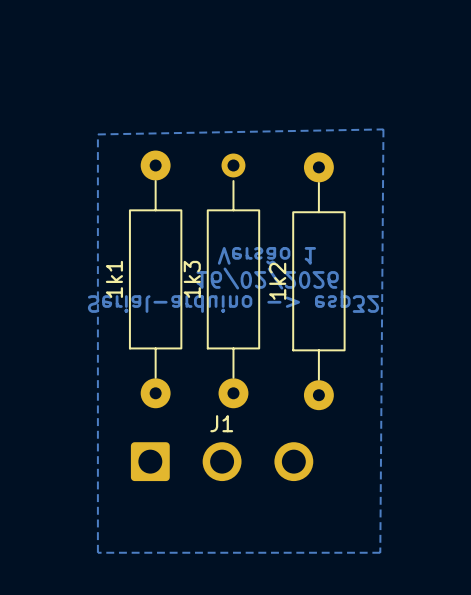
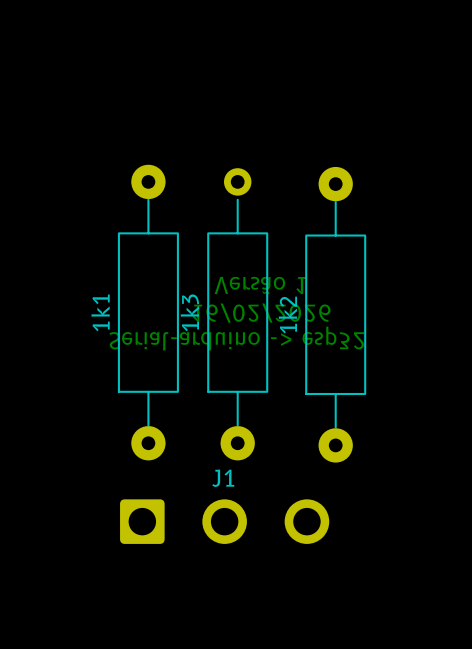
bottom zone outline: (383, 129) (97, 134) (97, 552) (380, 552) (383, 129) -> none

